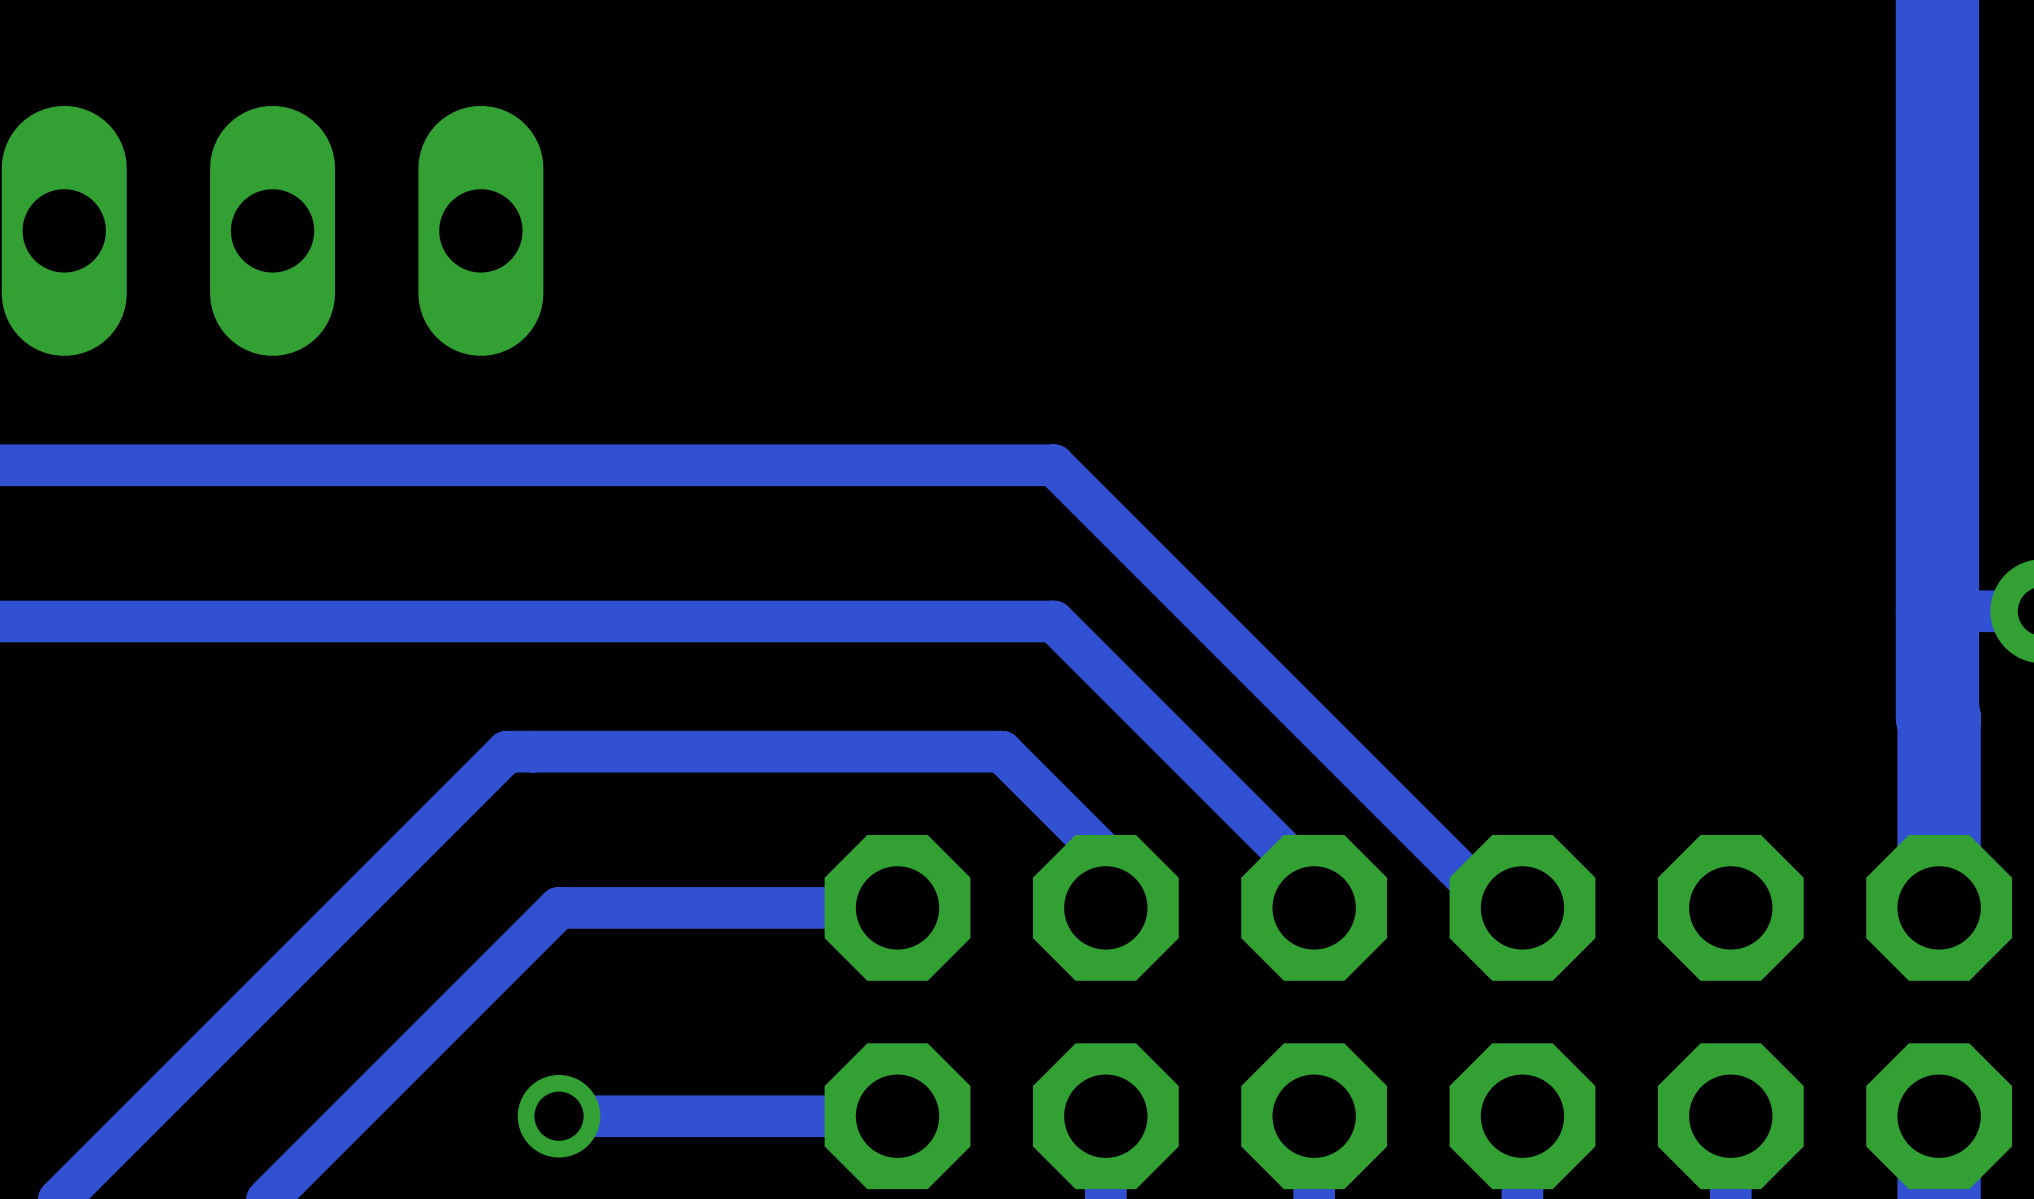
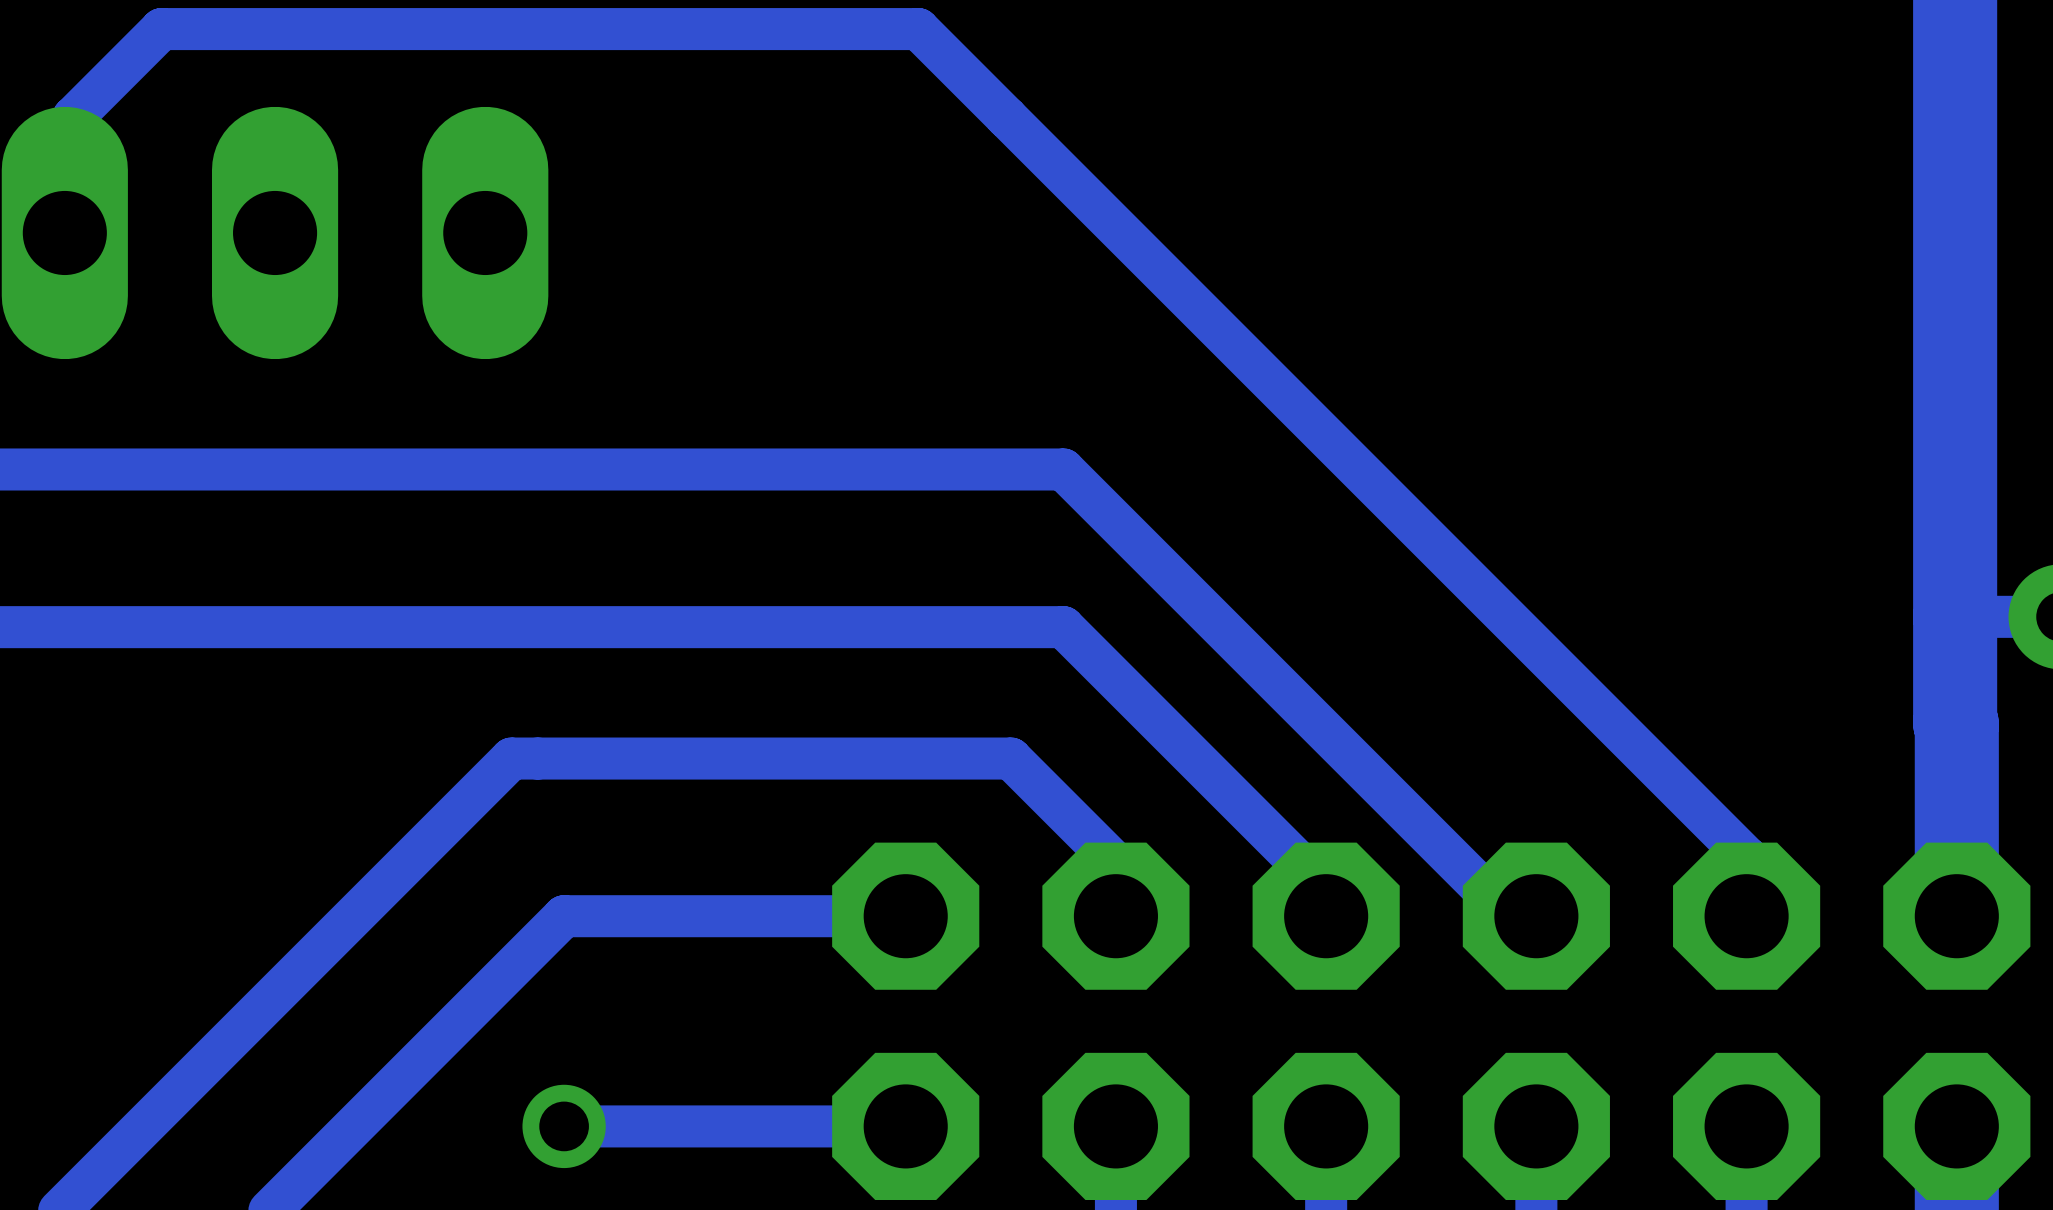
track: none -> (64, 232) (73, 224) (73, 117) (161, 29) (918, 29) (1746, 857) (1746, 916)

